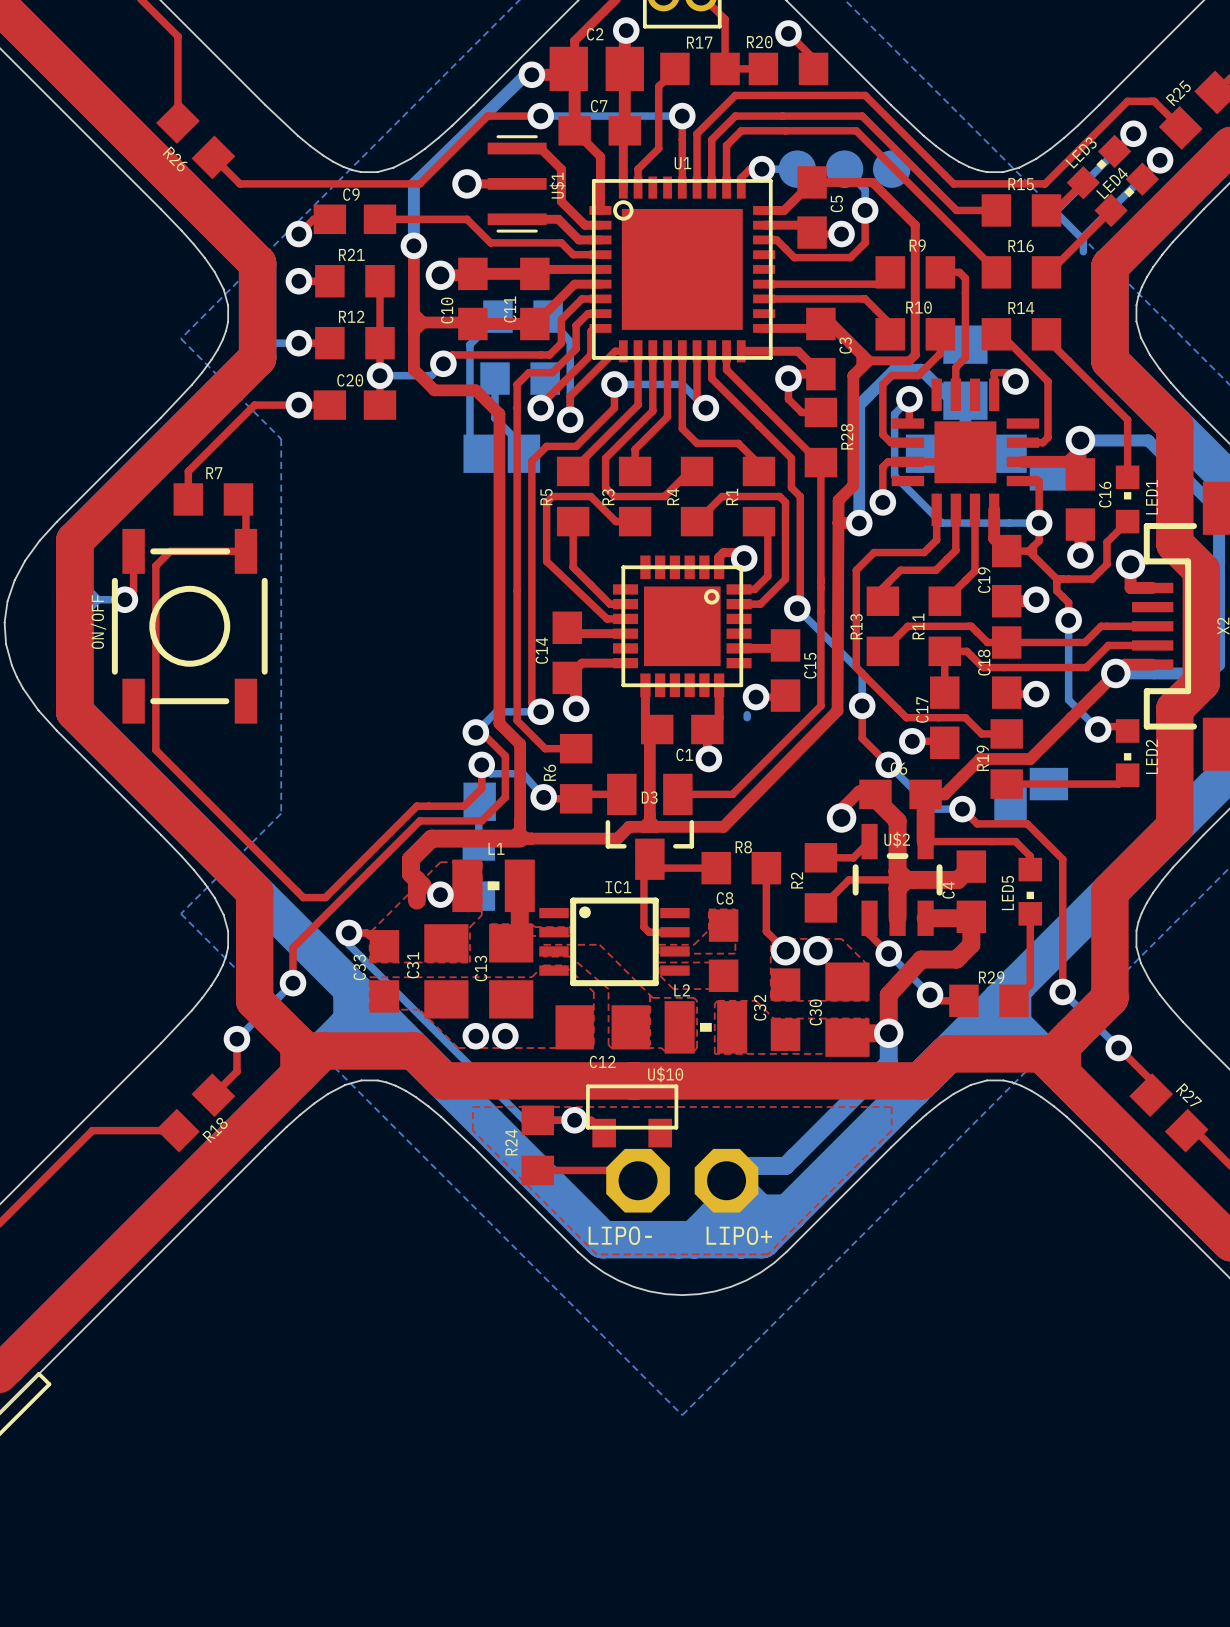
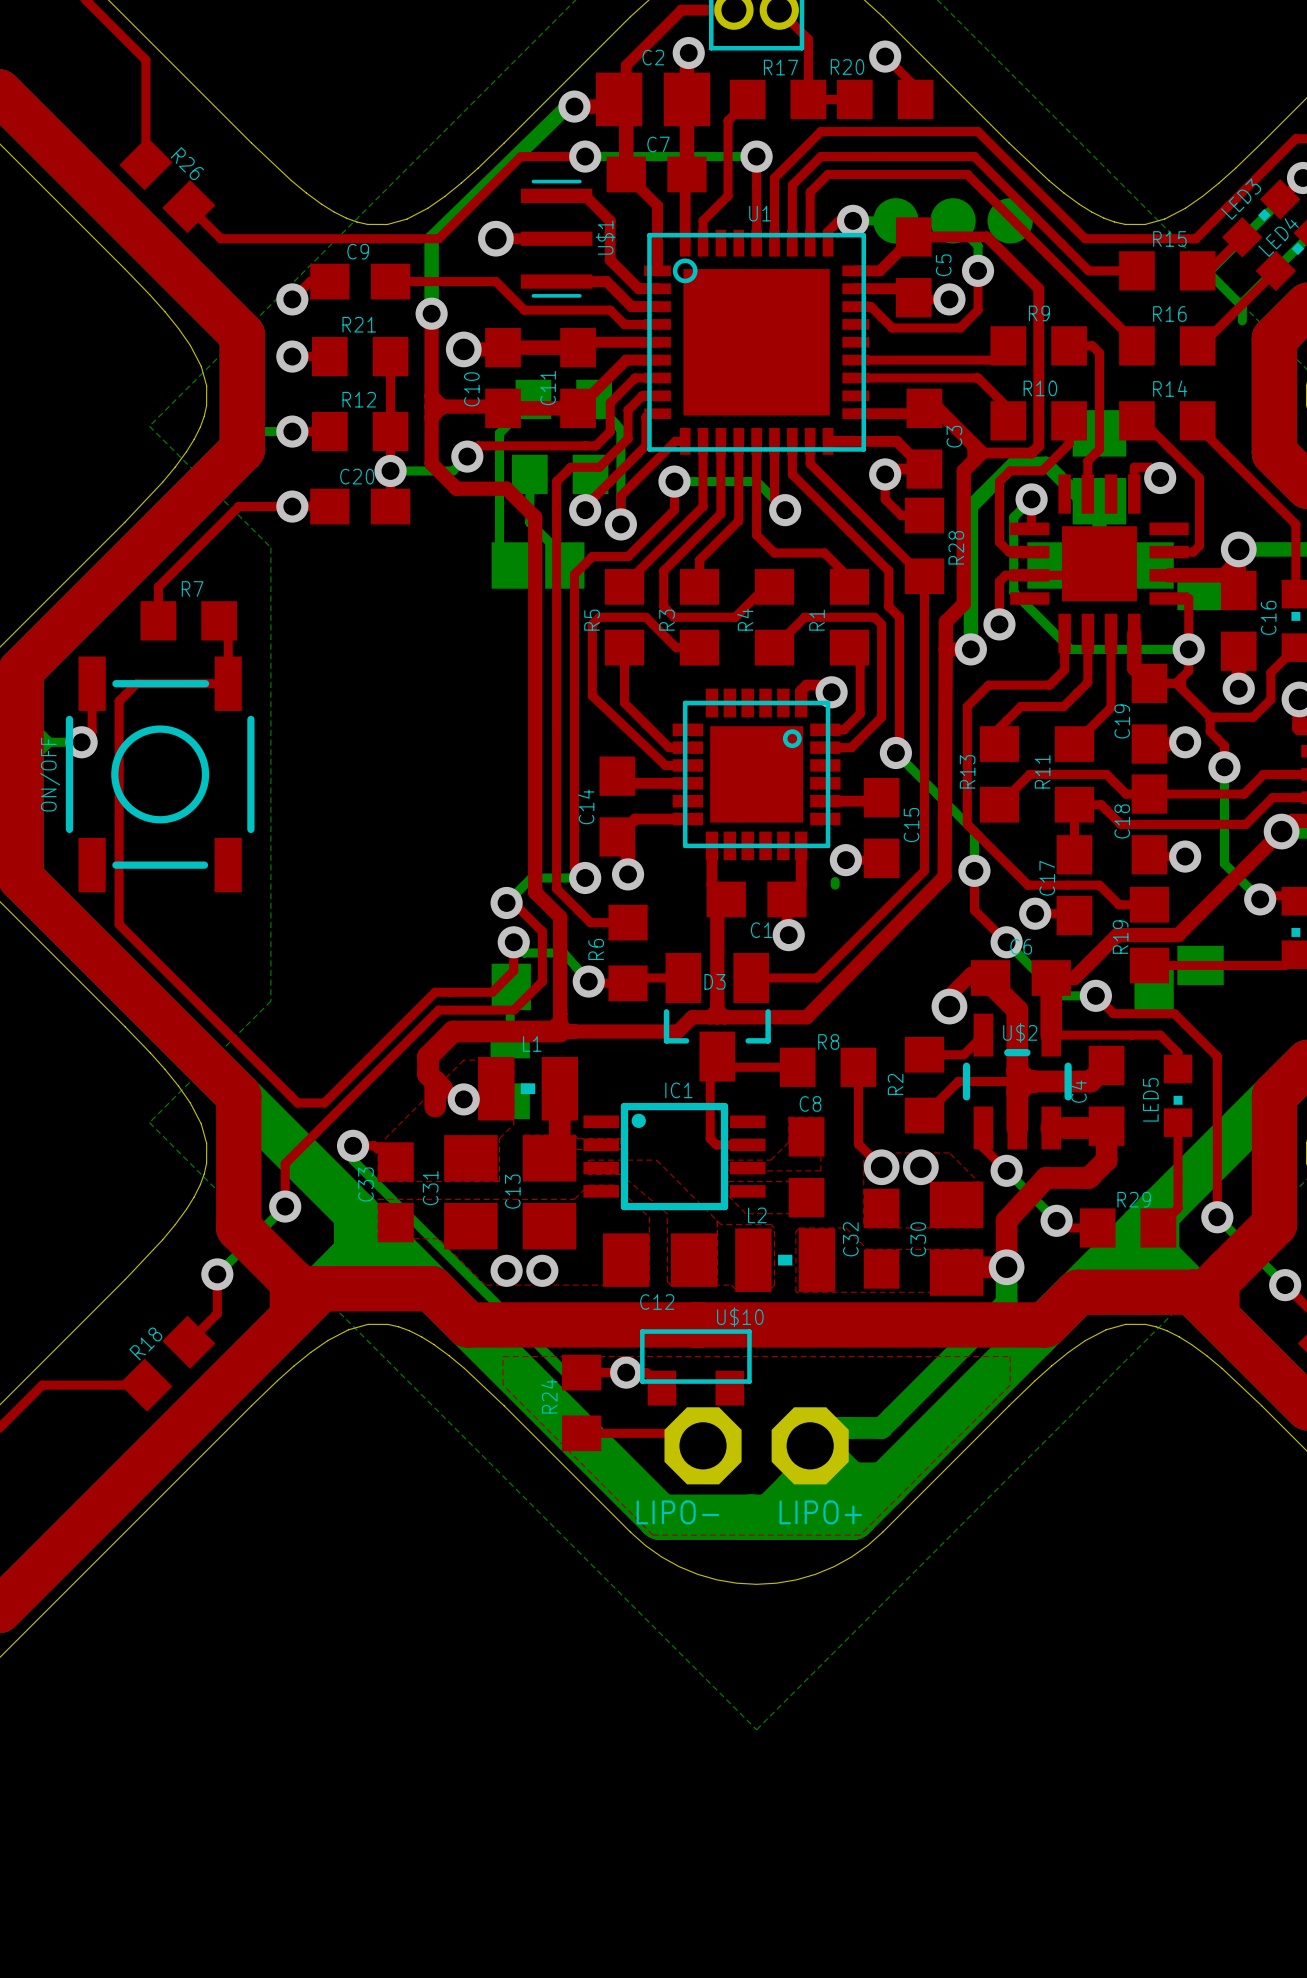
R26 name position: R26 (175, 158) -> R26 (187, 163)
R18 name position: R18 (214, 1130) -> R18 (145, 1343)

